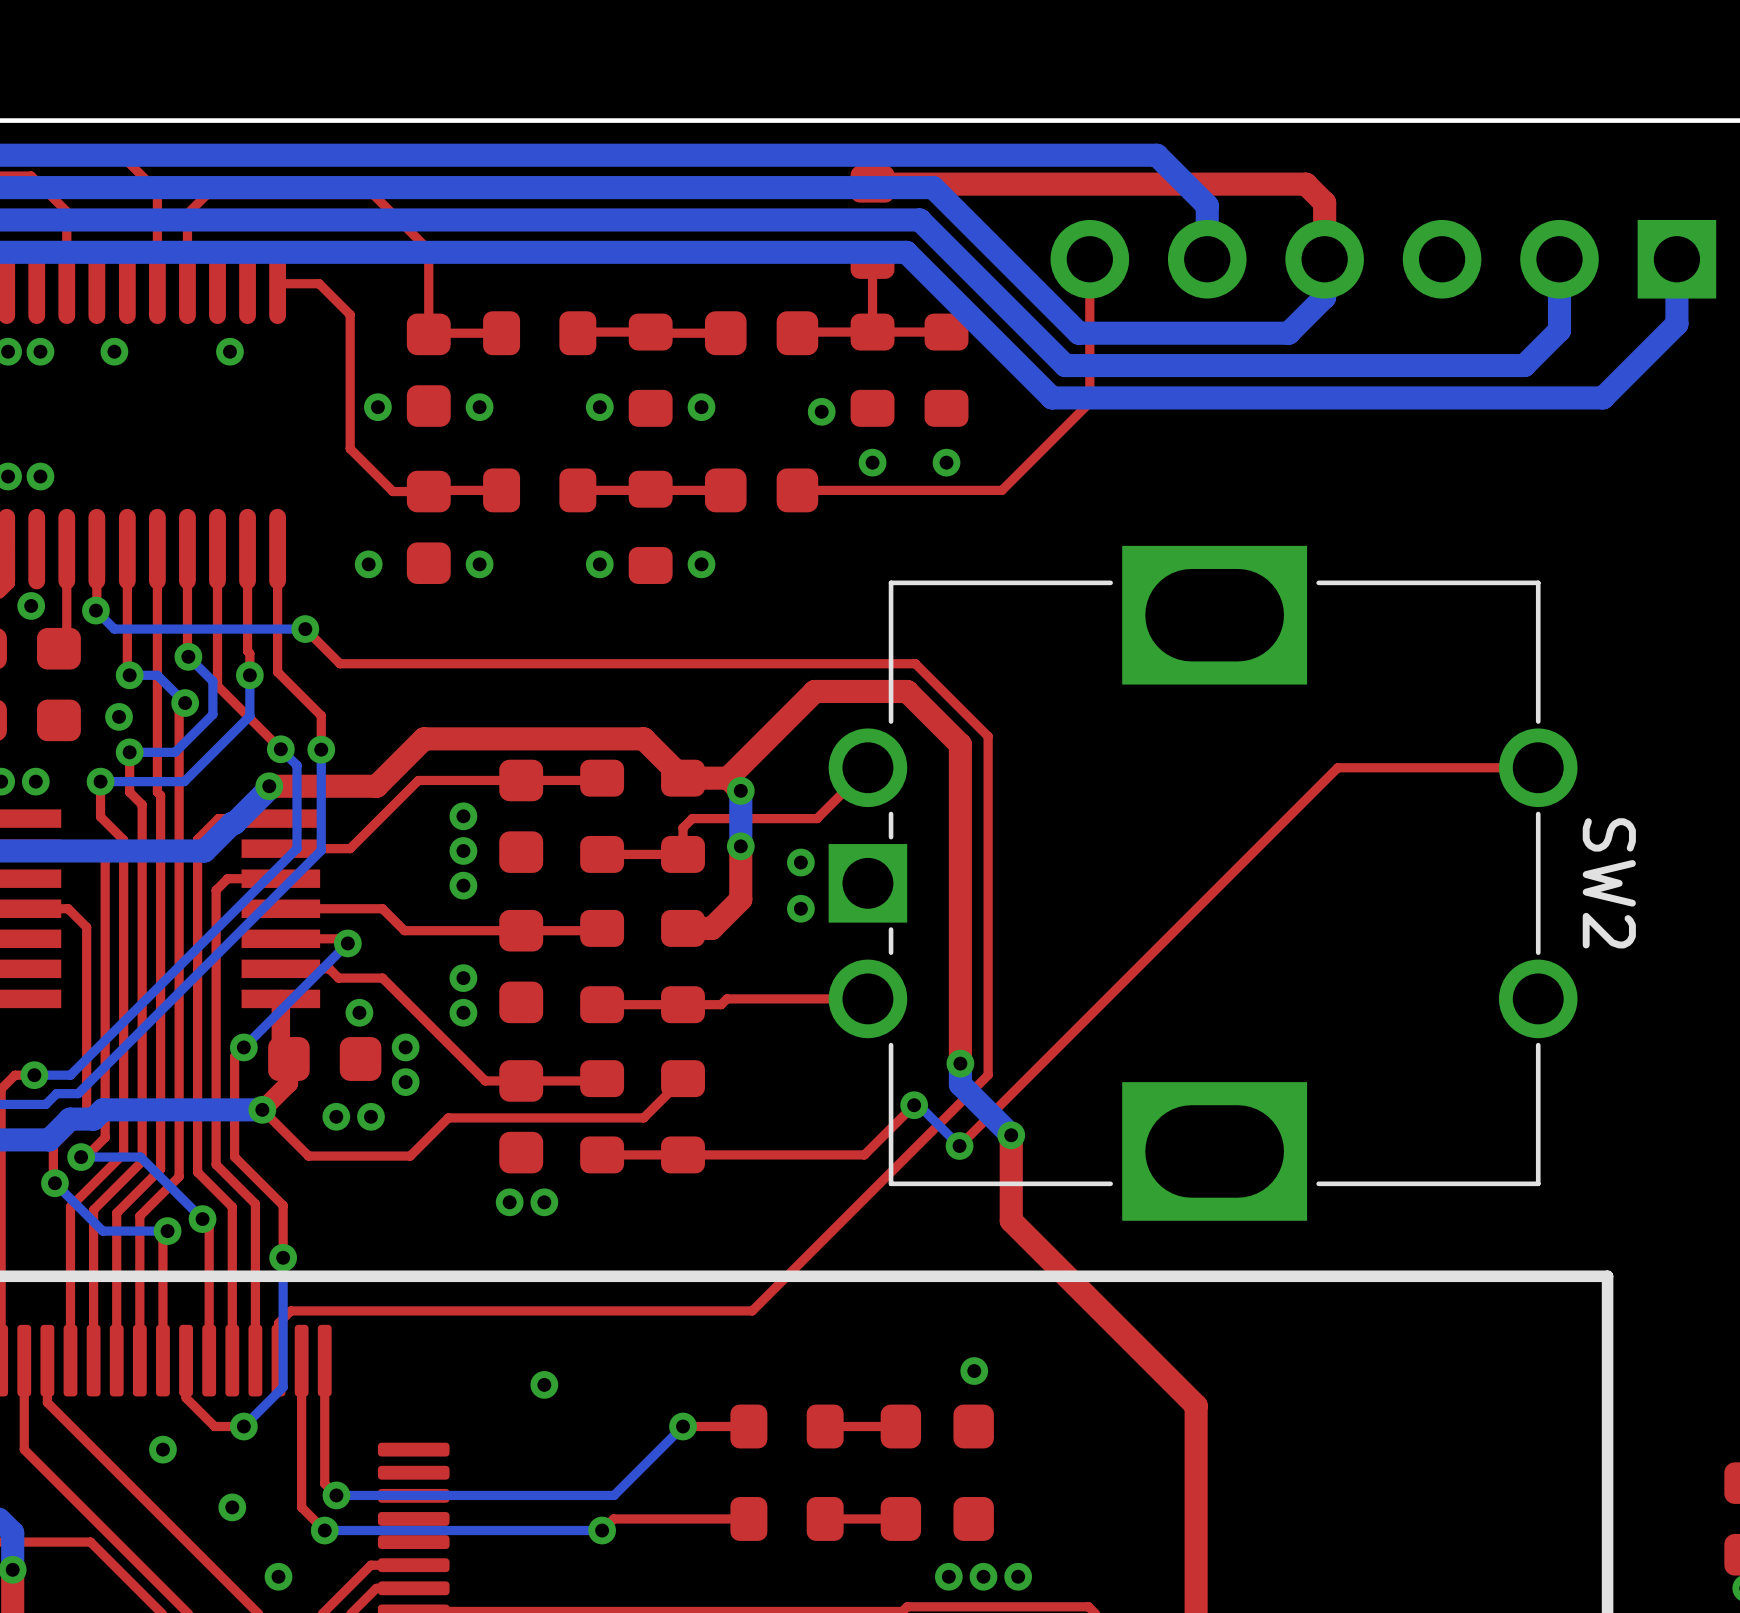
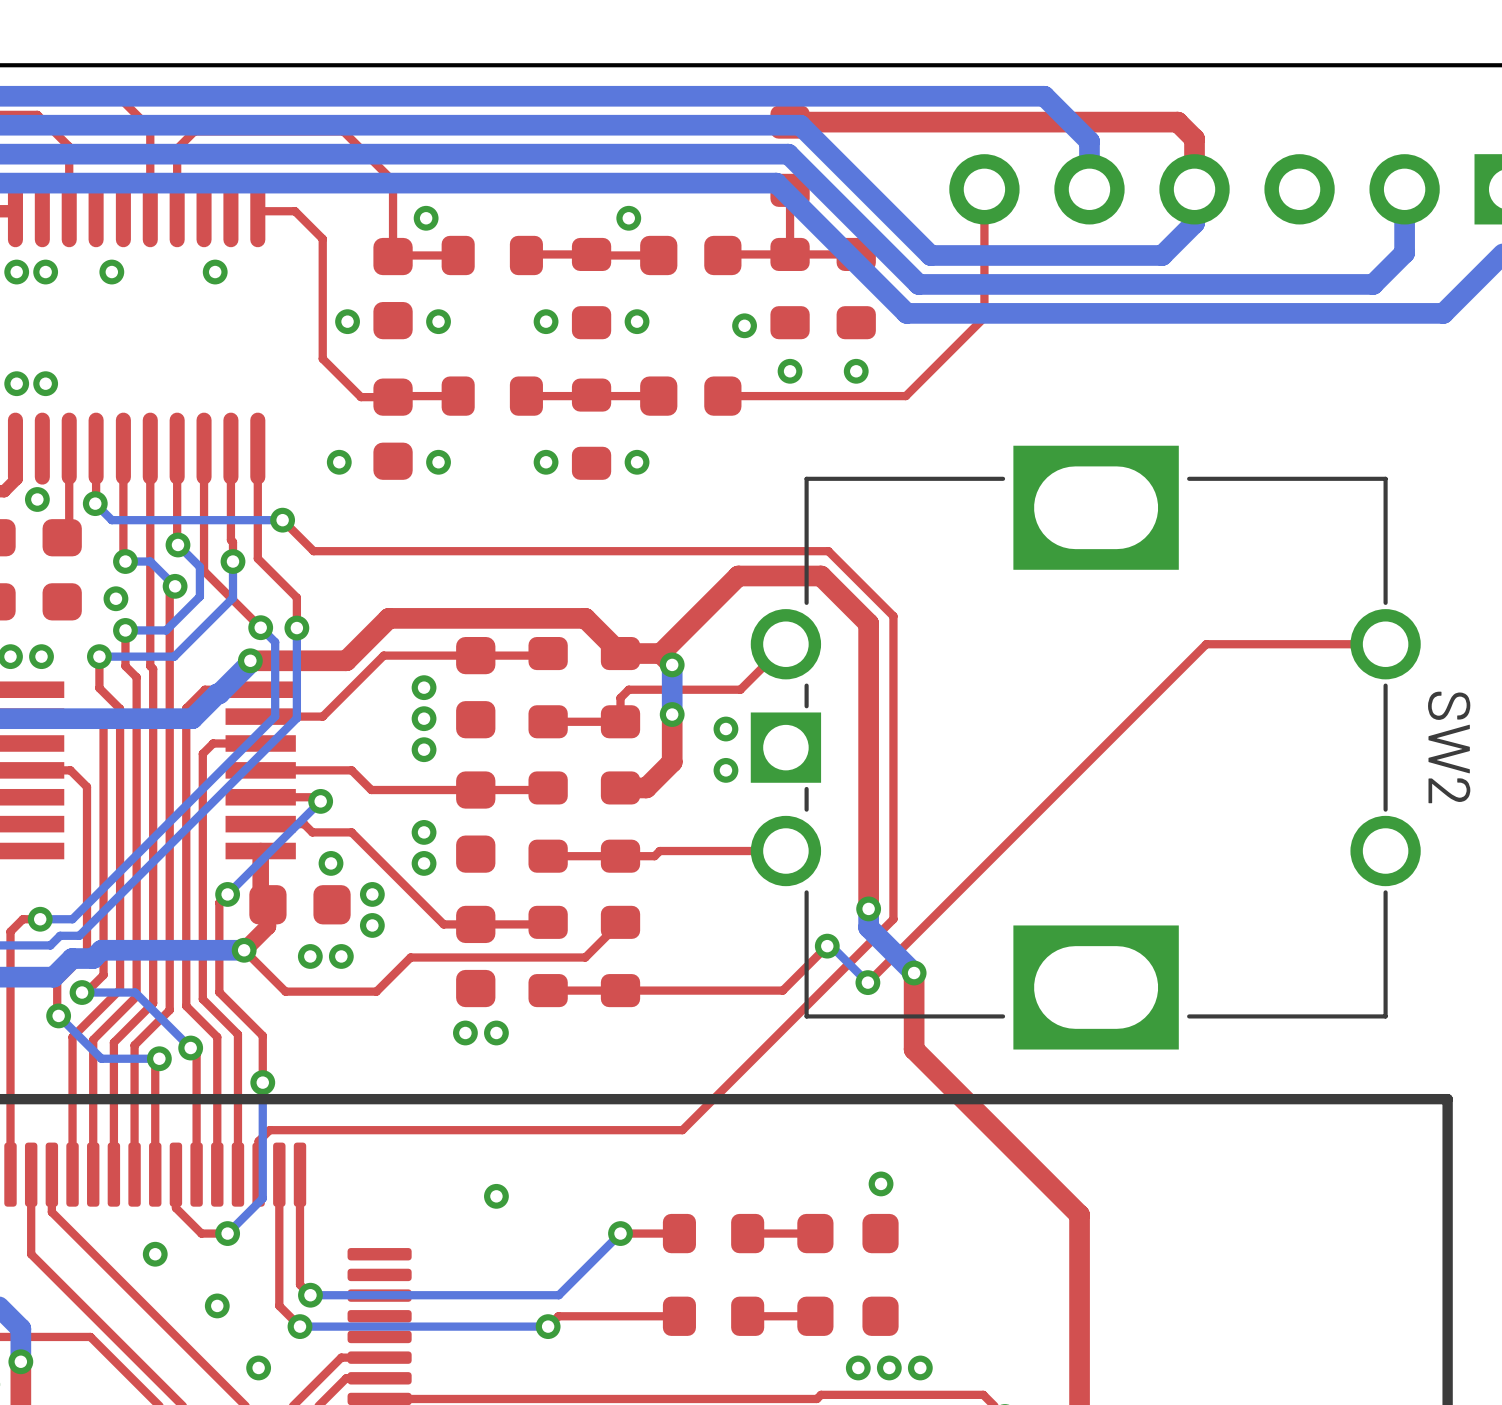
bottom track: (884, 187) (933, 187) (1078, 333) -> (800, 125) (930, 255) (974, 255)
bottom track: (870, 219) (919, 219) (1065, 365) -> (788, 154) (918, 284) (962, 284)
bottom track: (857, 252) (906, 252) (1051, 397) -> (776, 183) (906, 313) (950, 313)
via: none -> (426, 218)
via: none -> (628, 218)

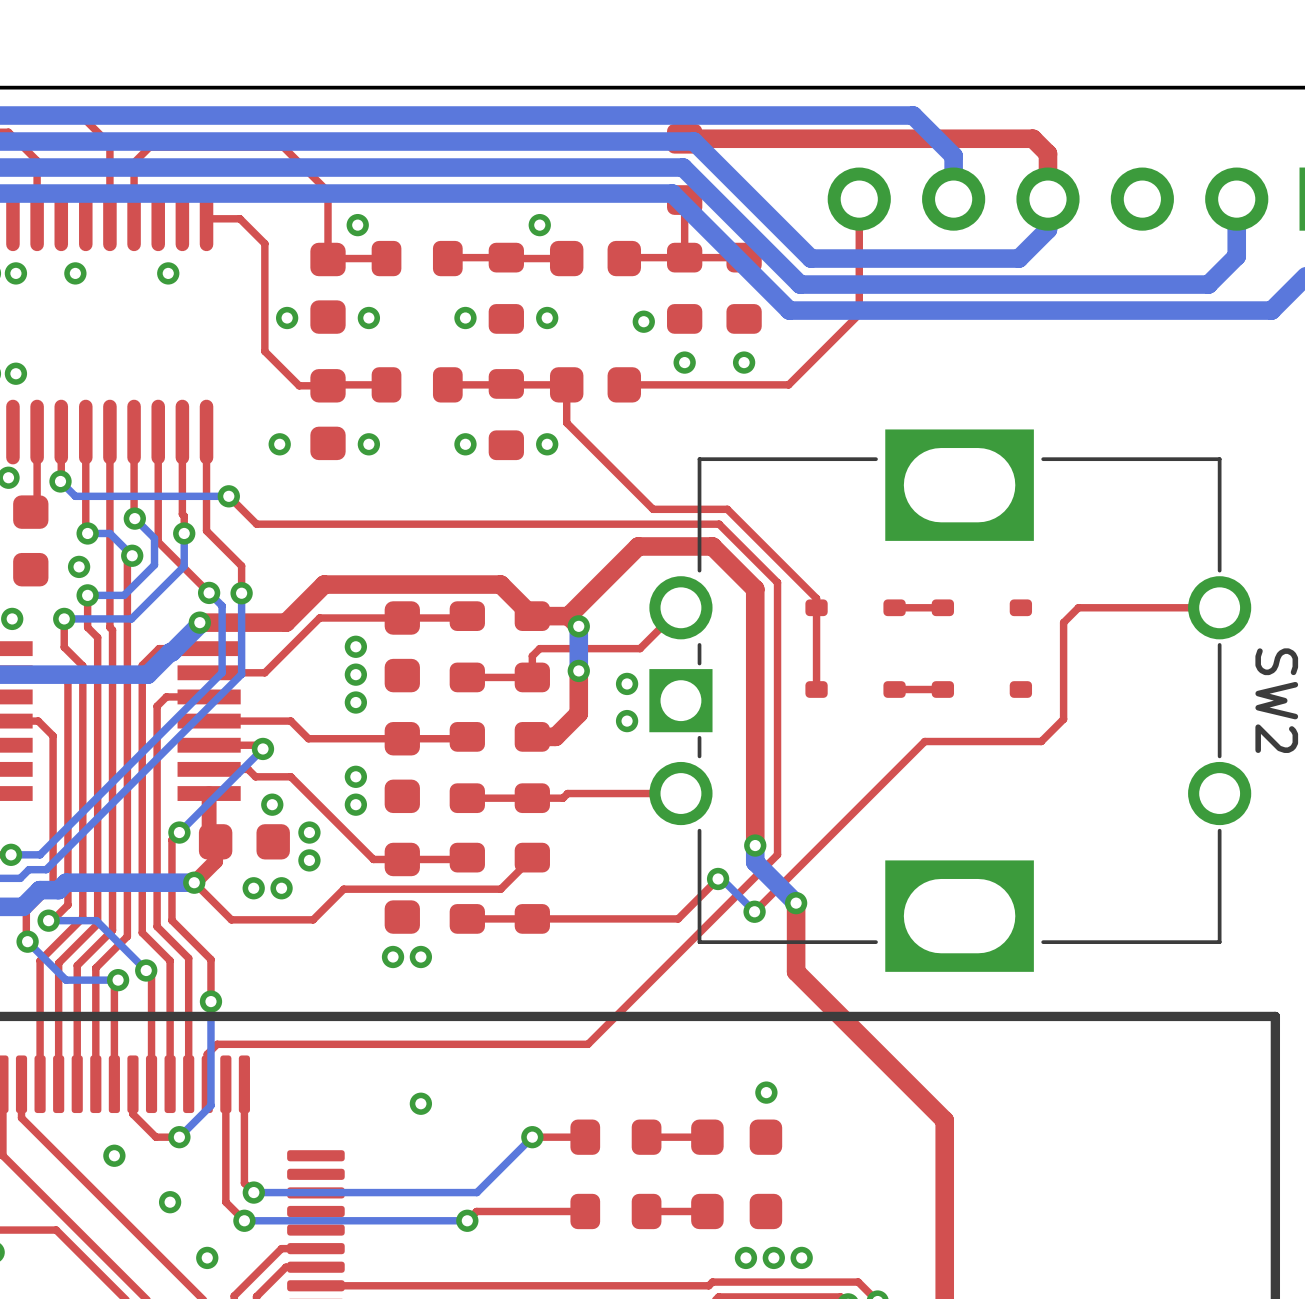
top track: none -> (566, 384) (566, 422) (653, 509) (727, 509) (816, 598) (816, 689)
part: none -> (855, 607)
top track: none -> (942, 607) (894, 607)
part: none -> (981, 607)
top track: (1228, 644) (1206, 644) (1057, 793) -> (1078, 607) (1063, 622) (1063, 719) (1041, 741) (924, 741)
part: none -> (855, 689)
top track: none -> (942, 689) (894, 689)
part: none -> (981, 689)

